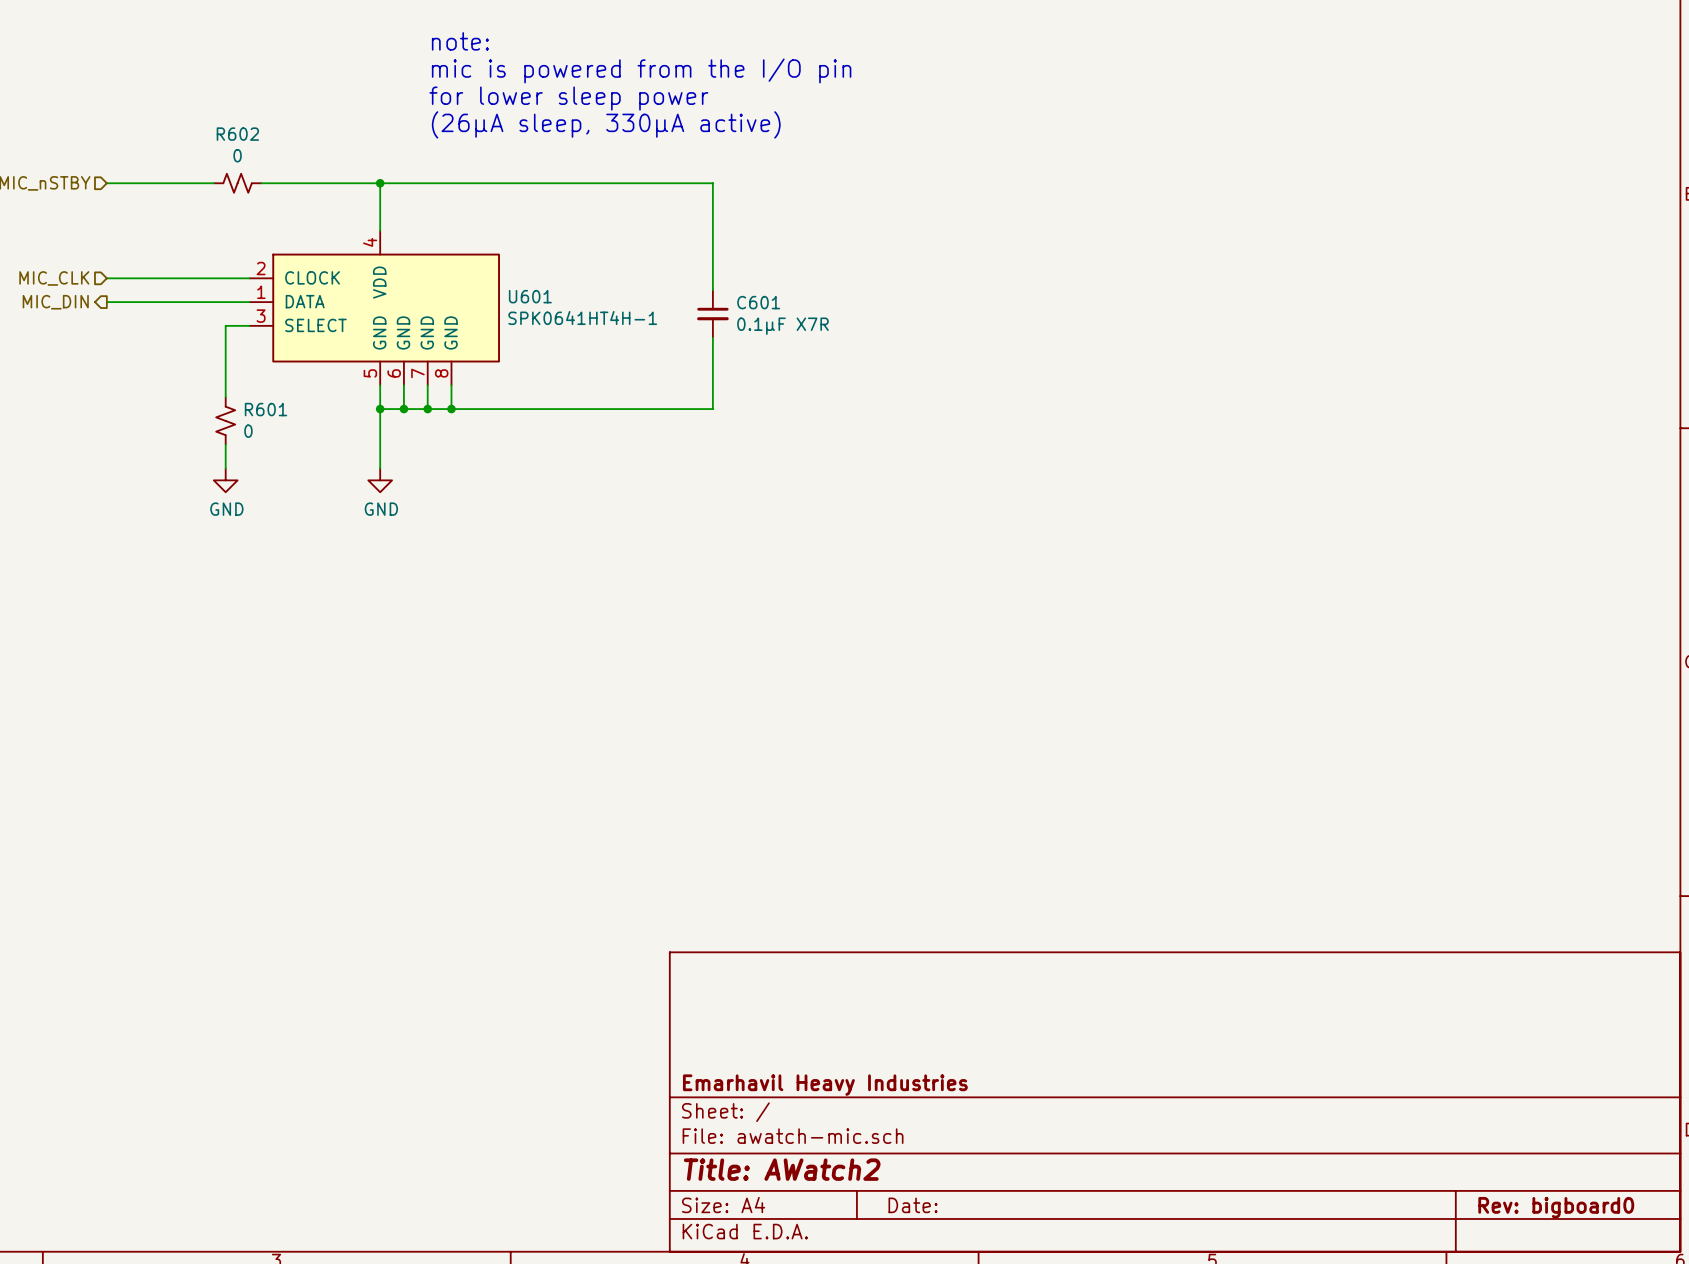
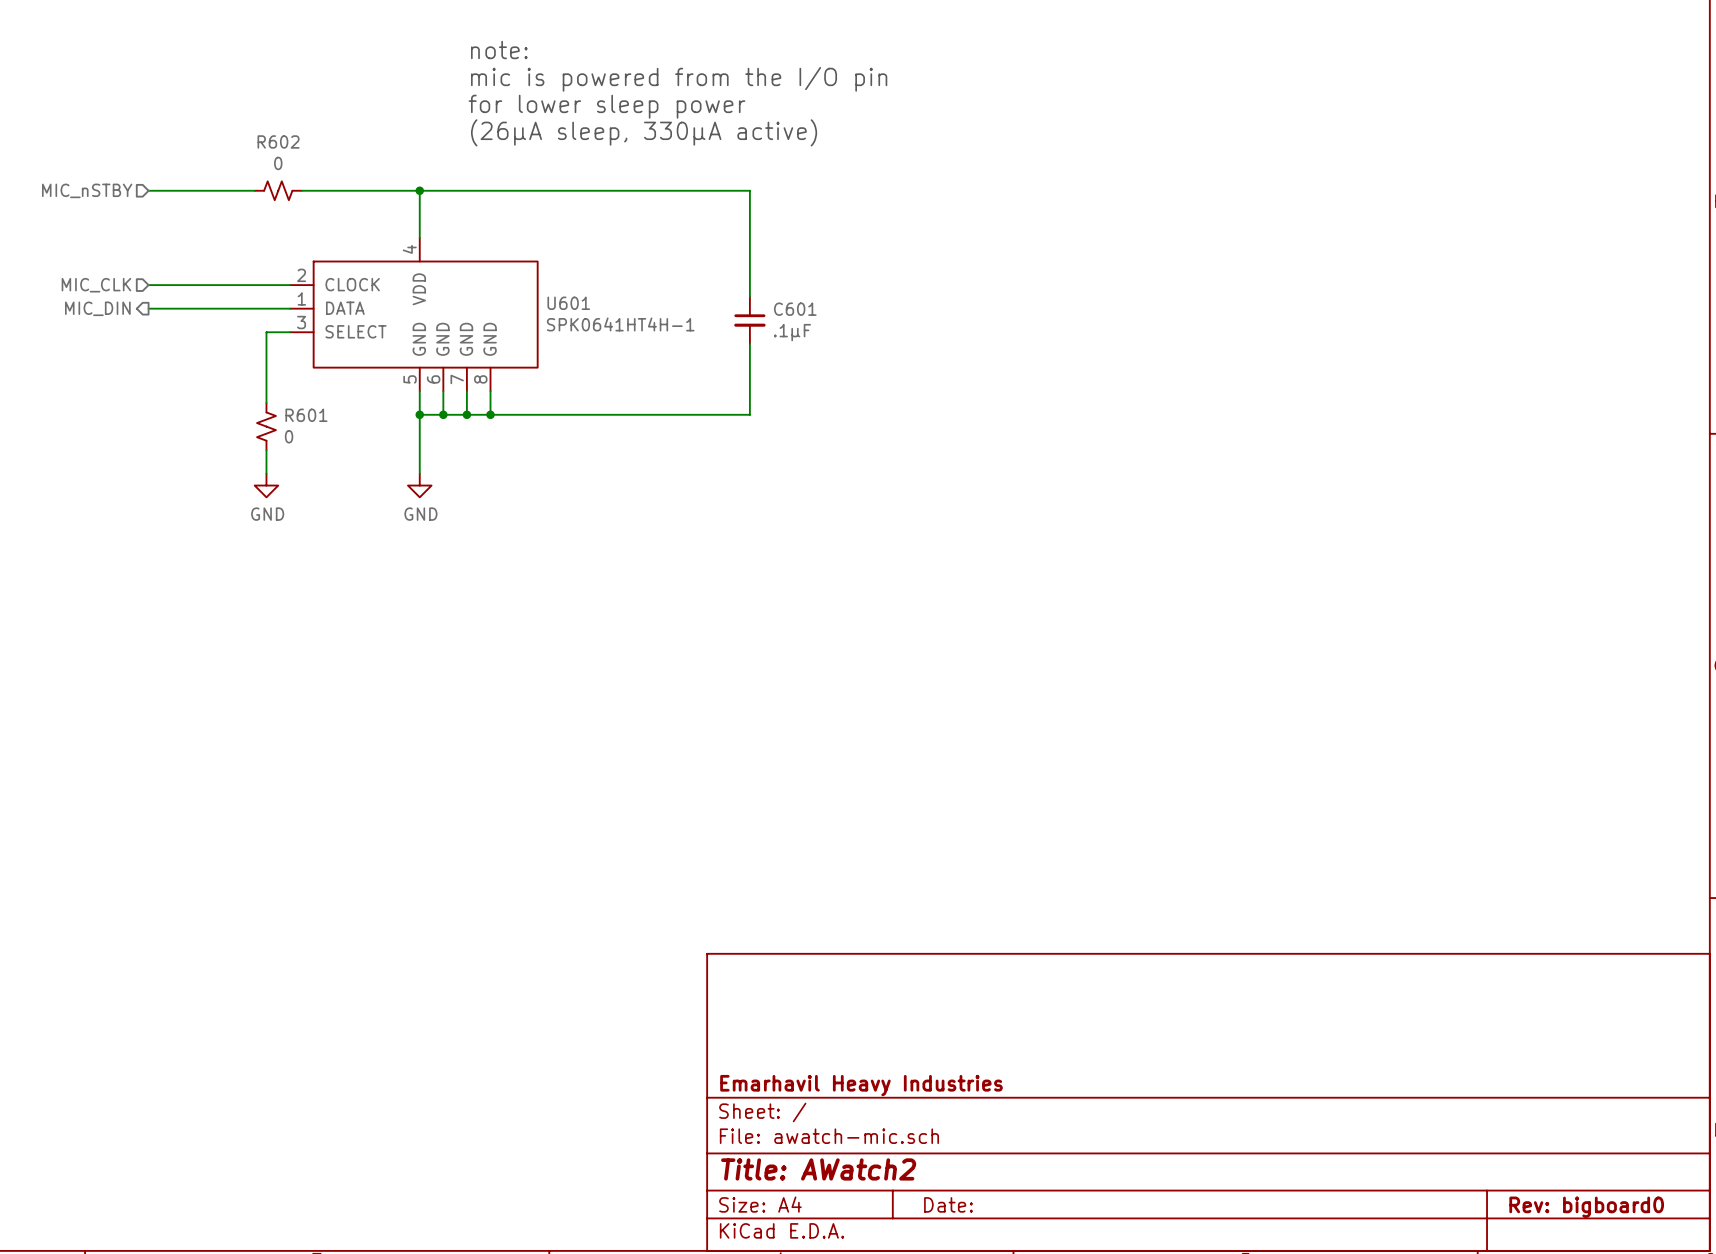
C601 value: 0.1µF X7R (782, 326) -> .1µF (792, 332)

